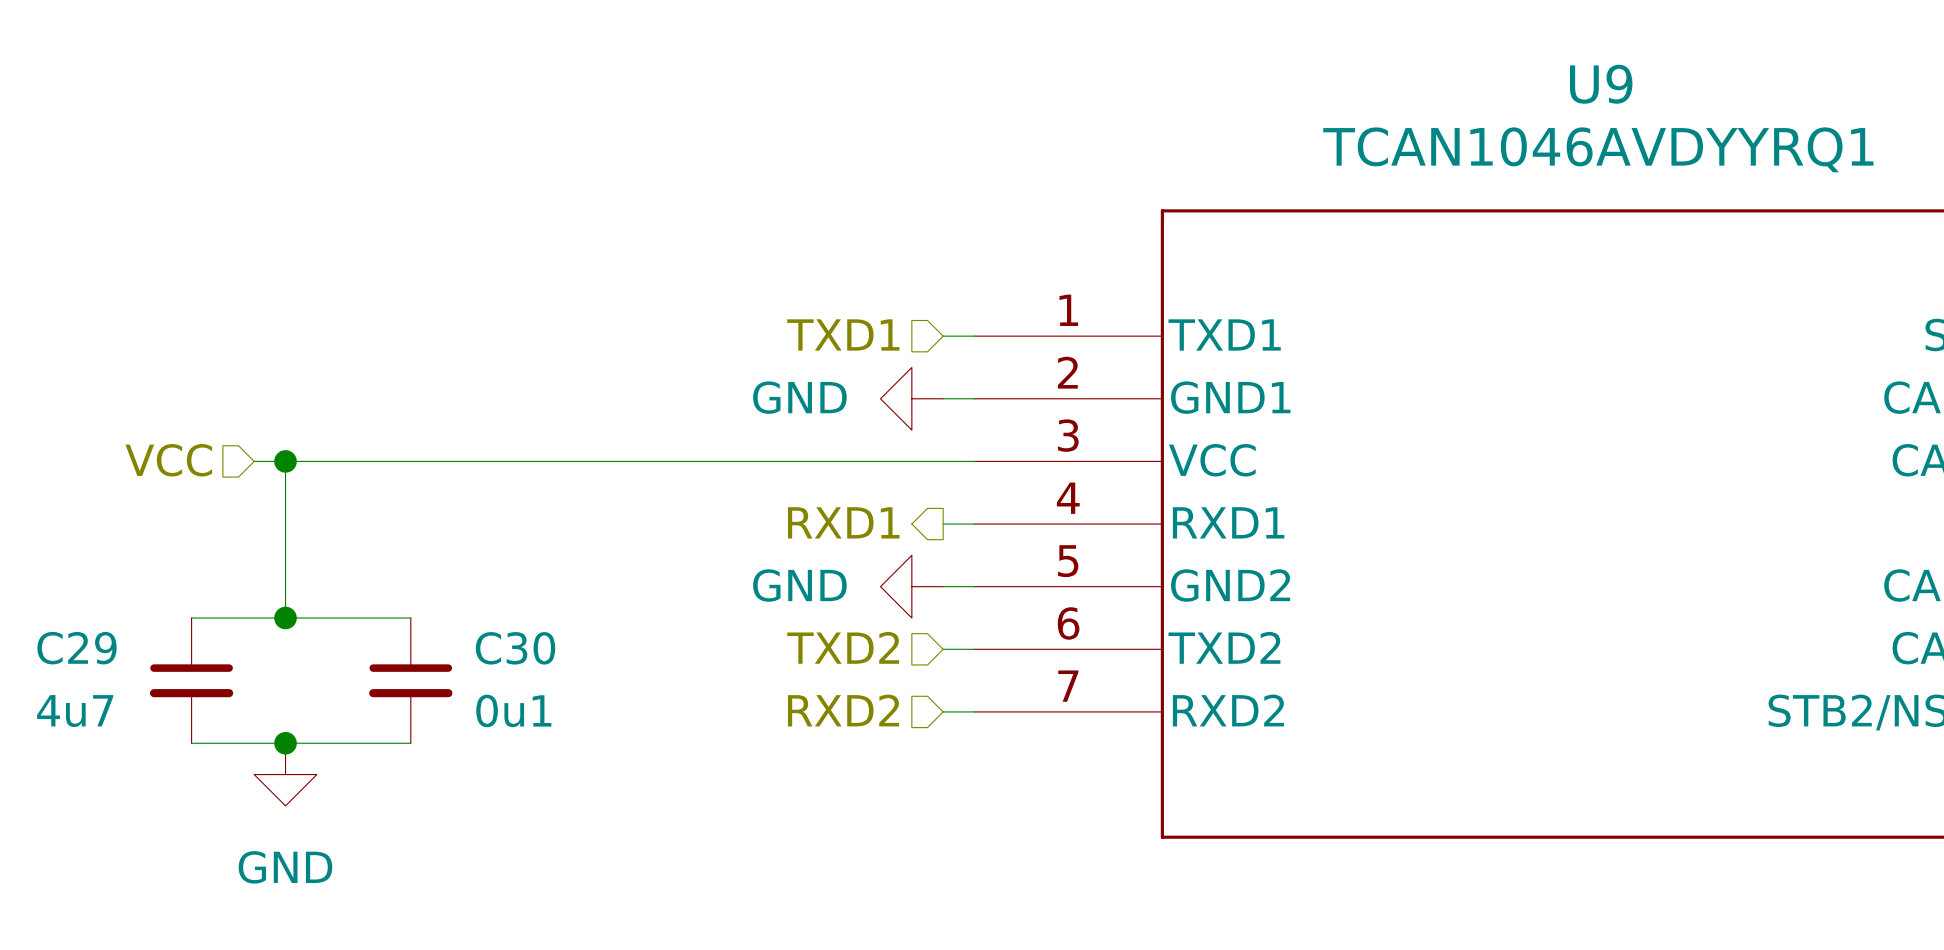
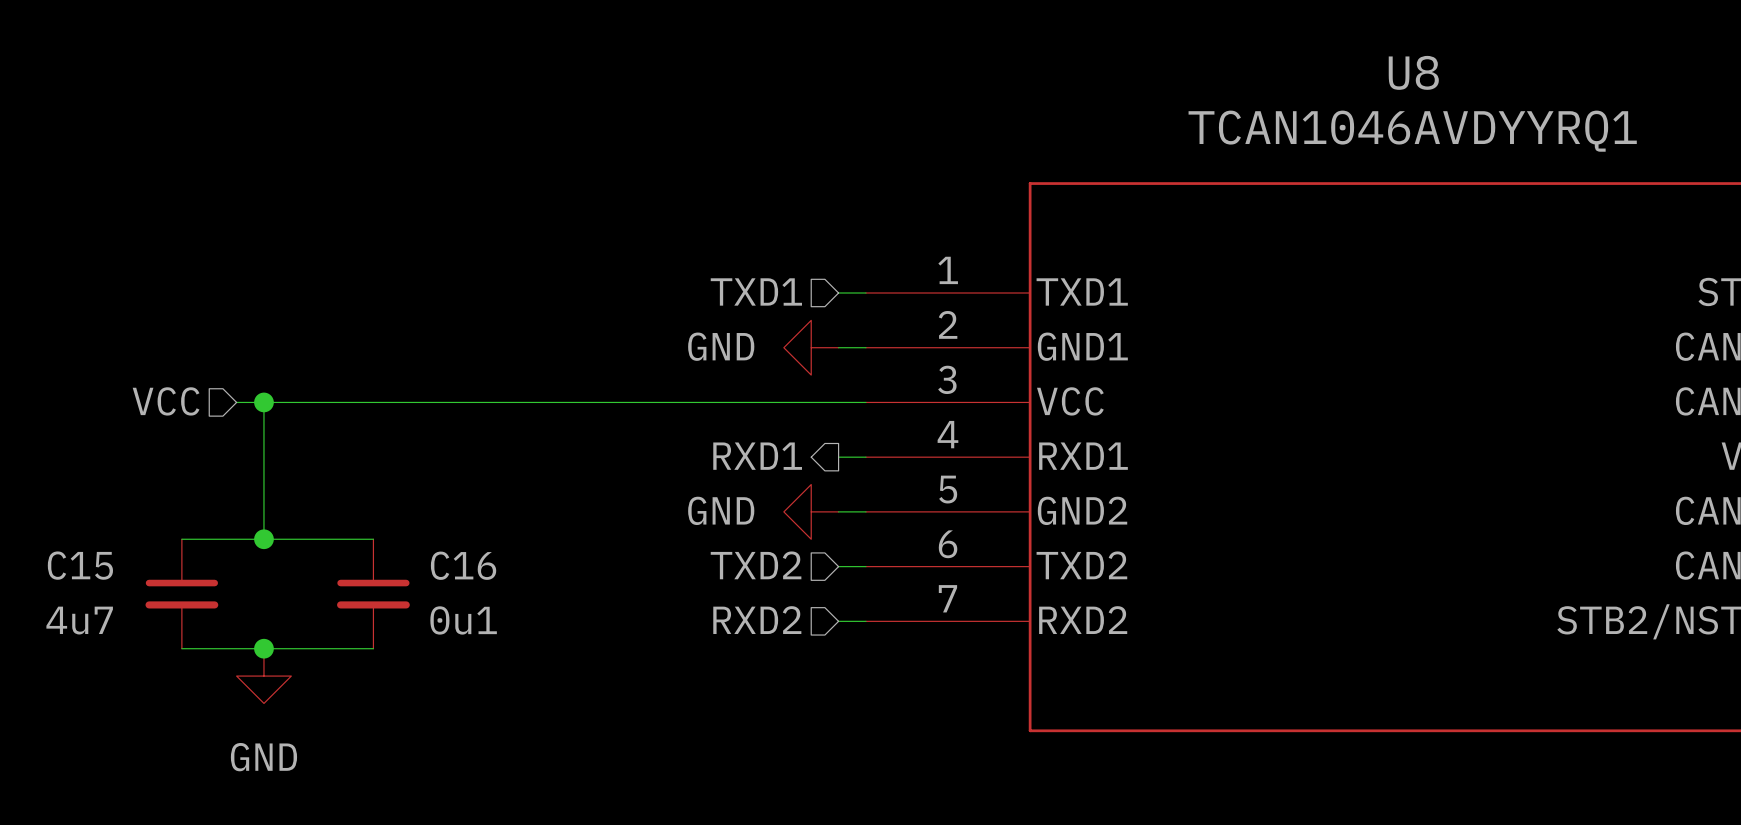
U9 name: U9 (1601, 84) -> U8 (1413, 72)
C29 name: C29 (77, 648) -> C15 (80, 565)
C30 name: C30 (515, 648) -> C16 (463, 565)

